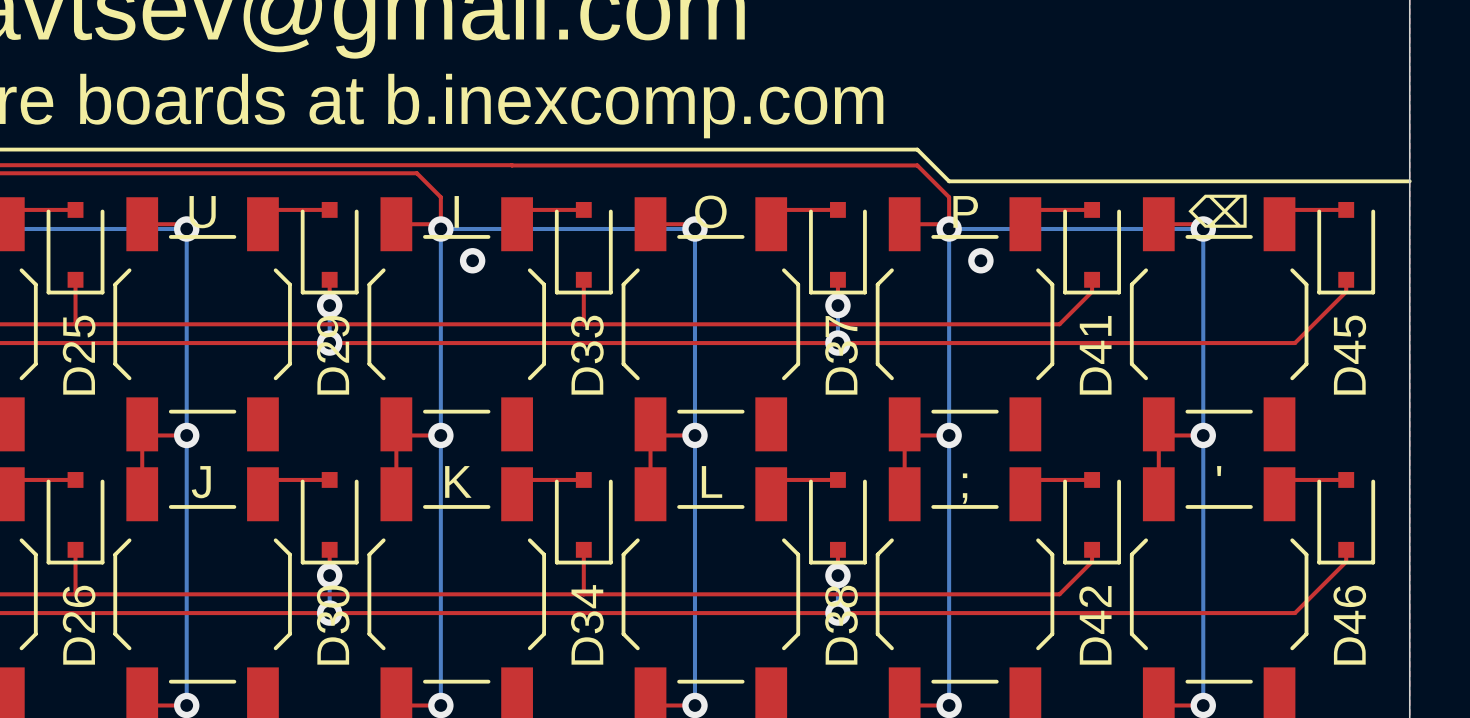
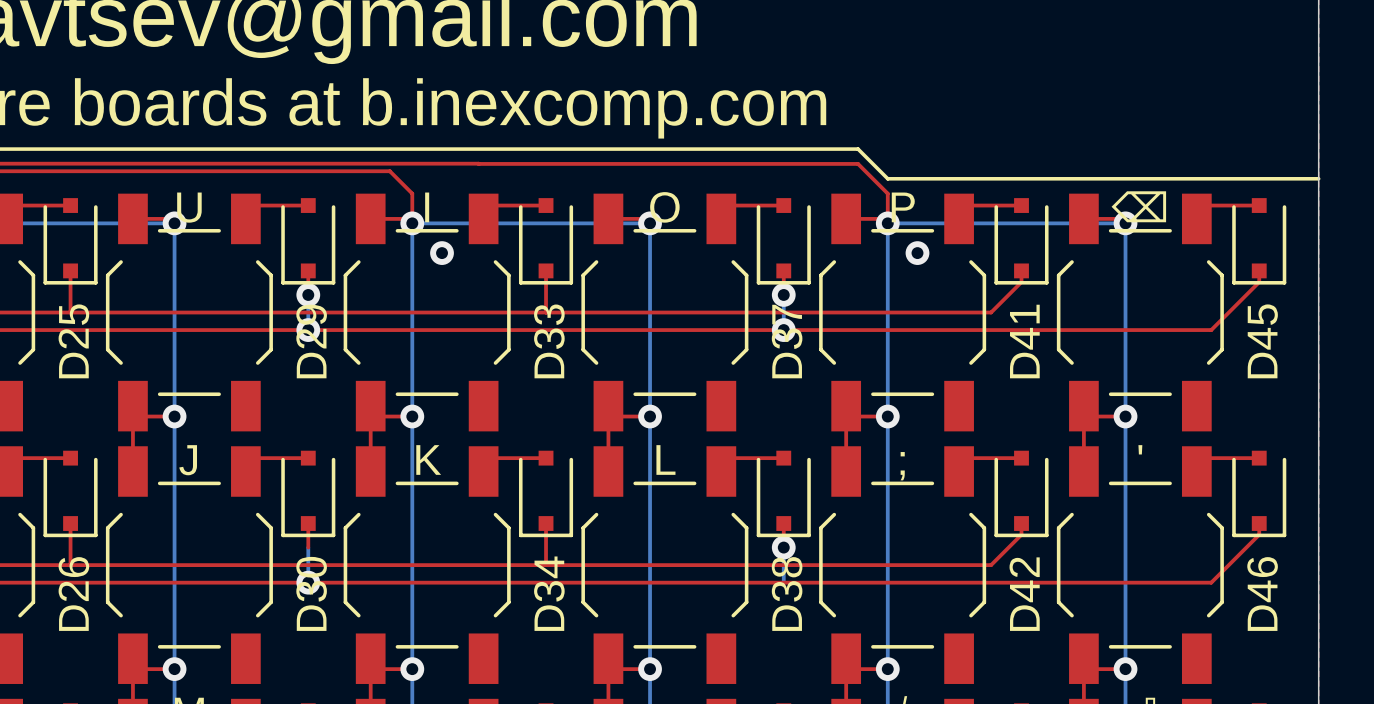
via: (329, 575) -> none
via: (837, 613) -> none

